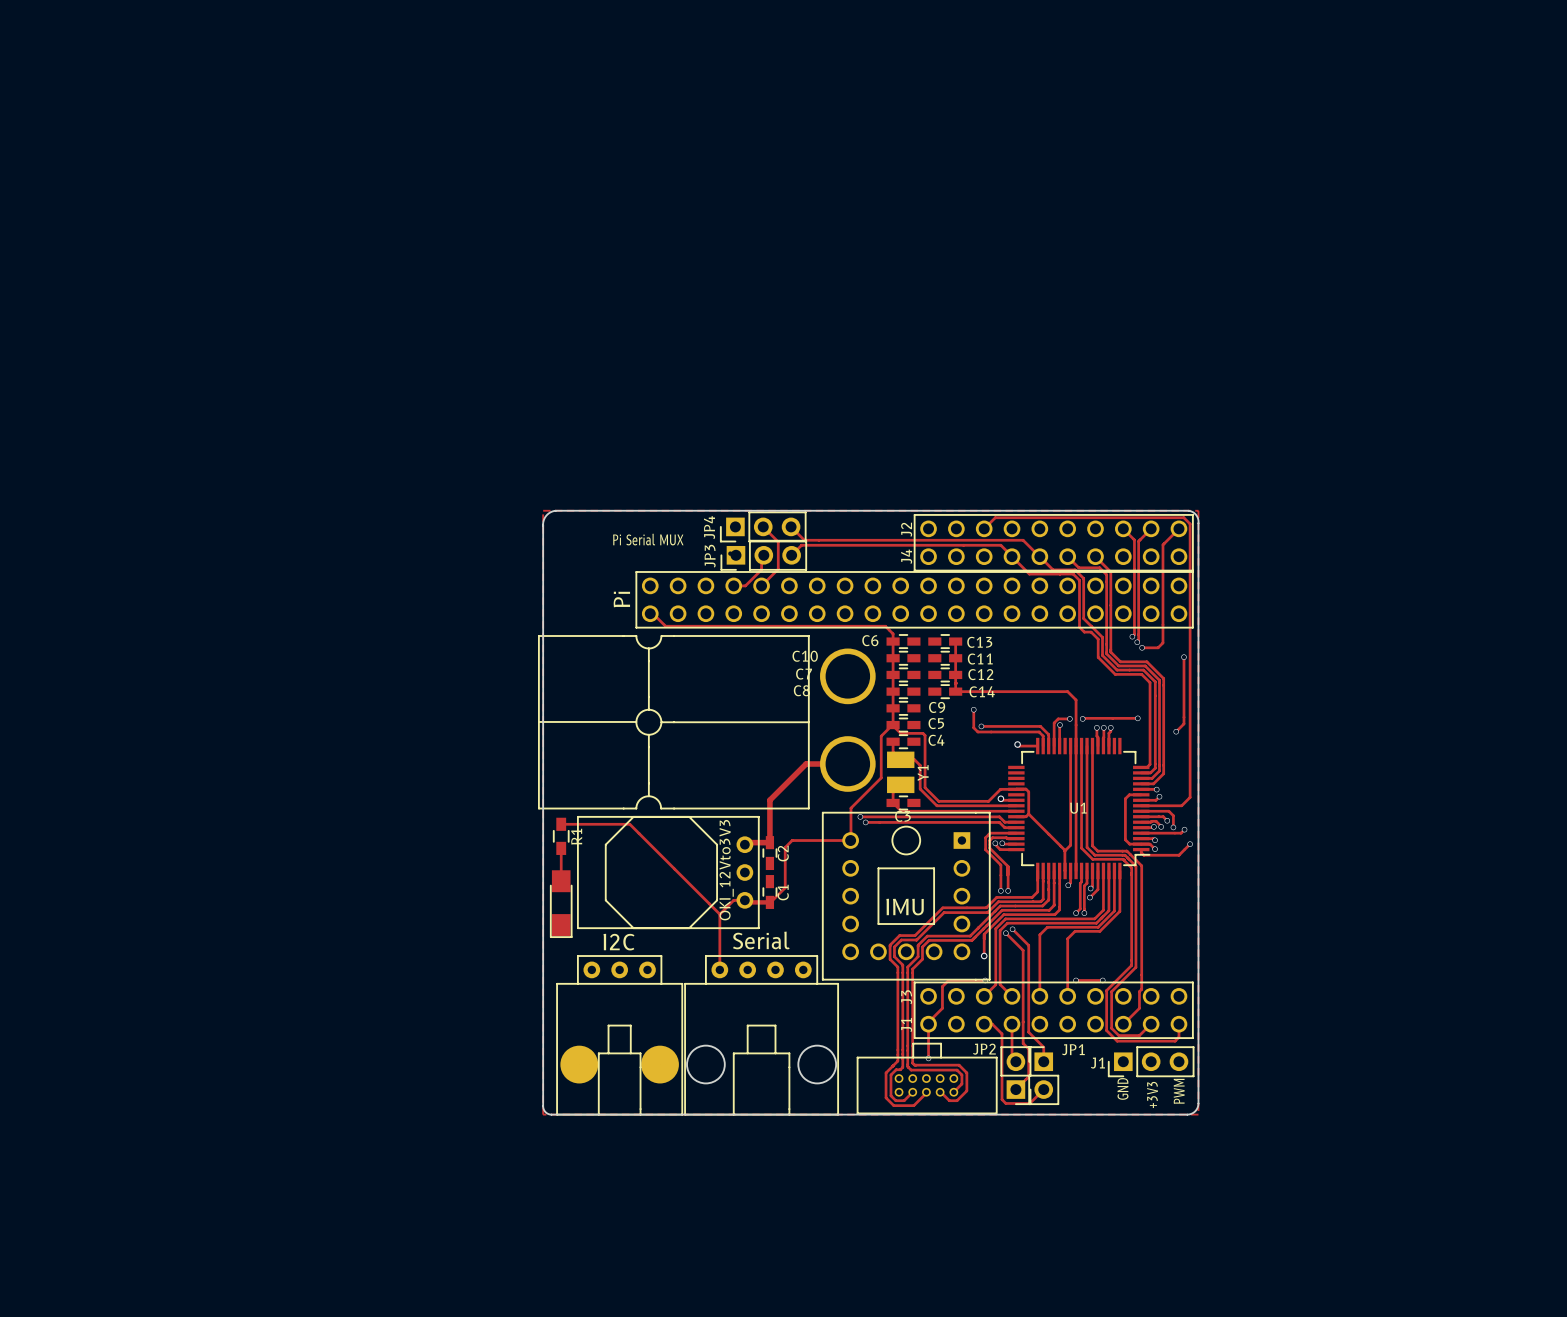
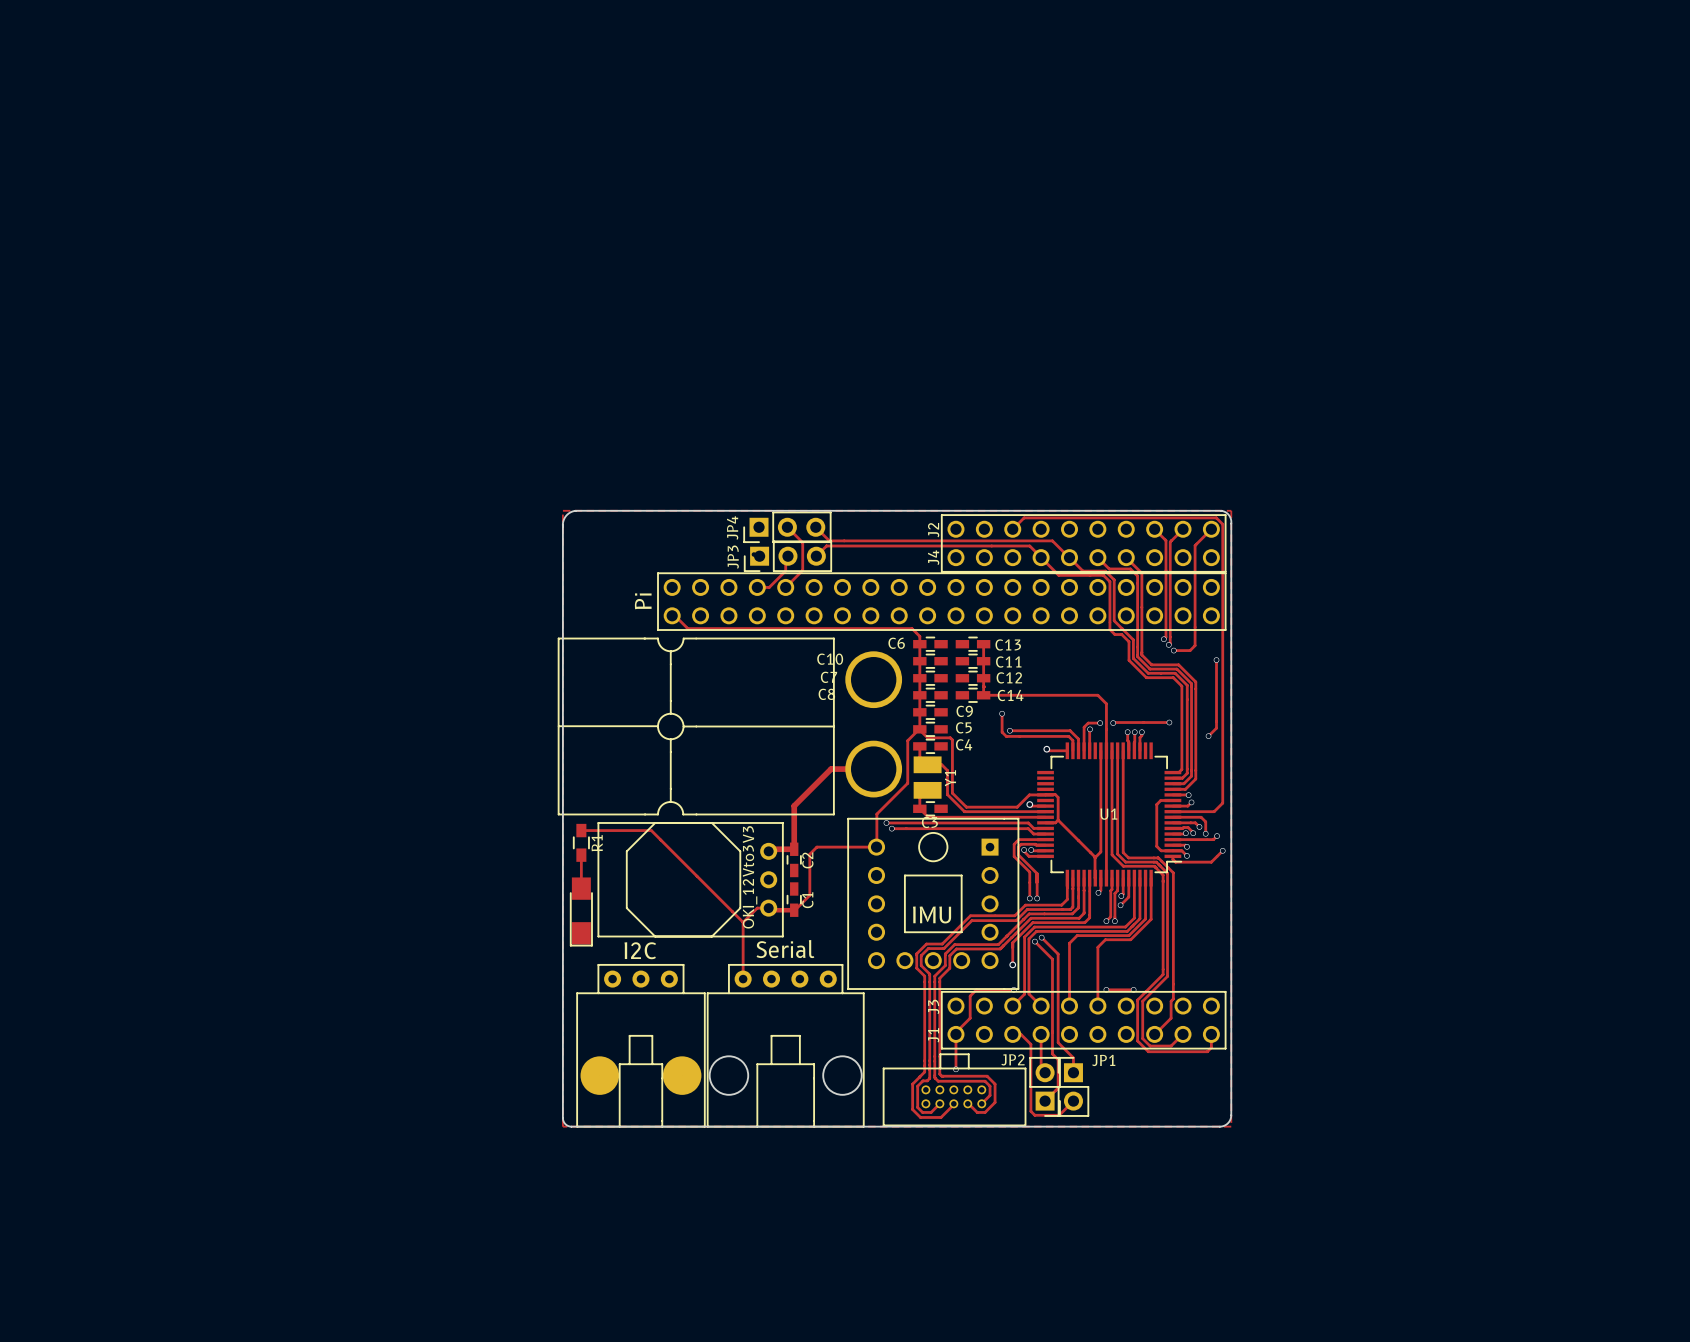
text: Pi Serial MUX (648, 539) -> none
J1: (1151, 1061) -> none
text: GND (1122, 1088) -> none
text: PWM (1179, 1091) -> none
text: +3V3 (1152, 1094) -> none

